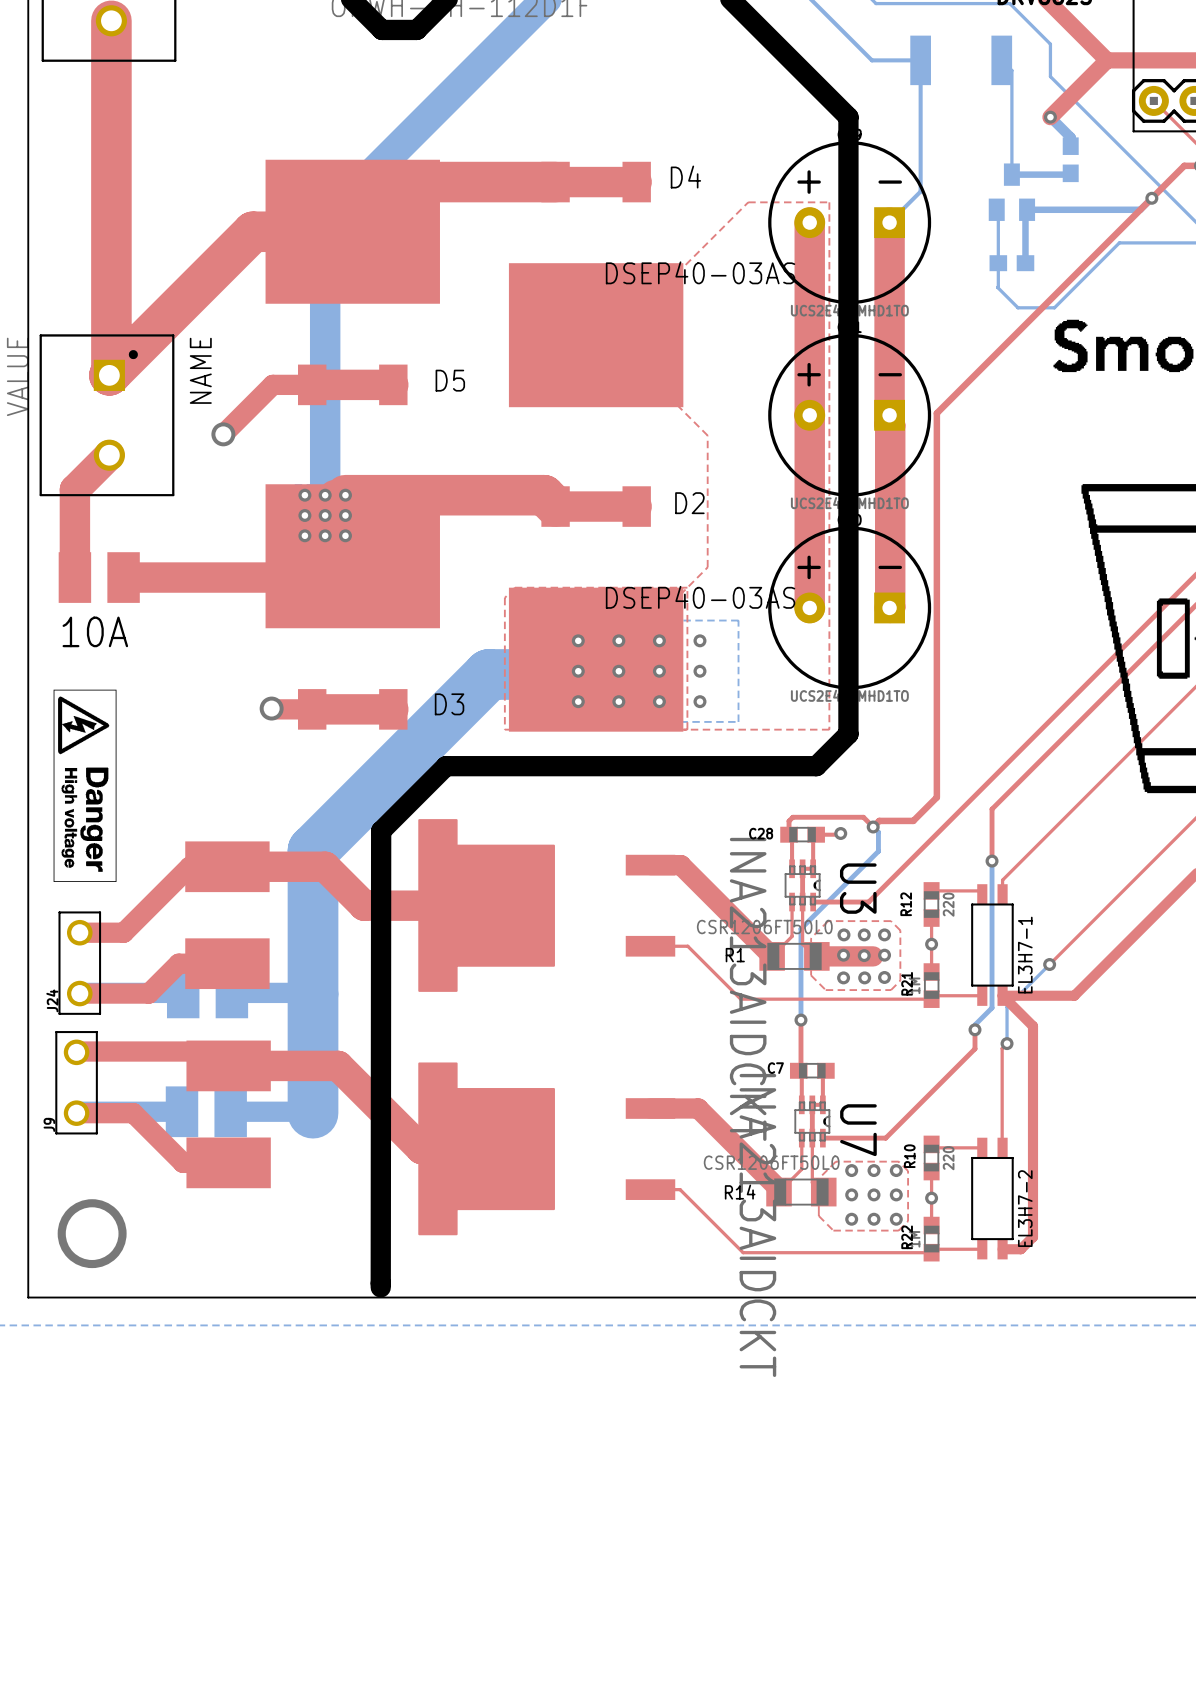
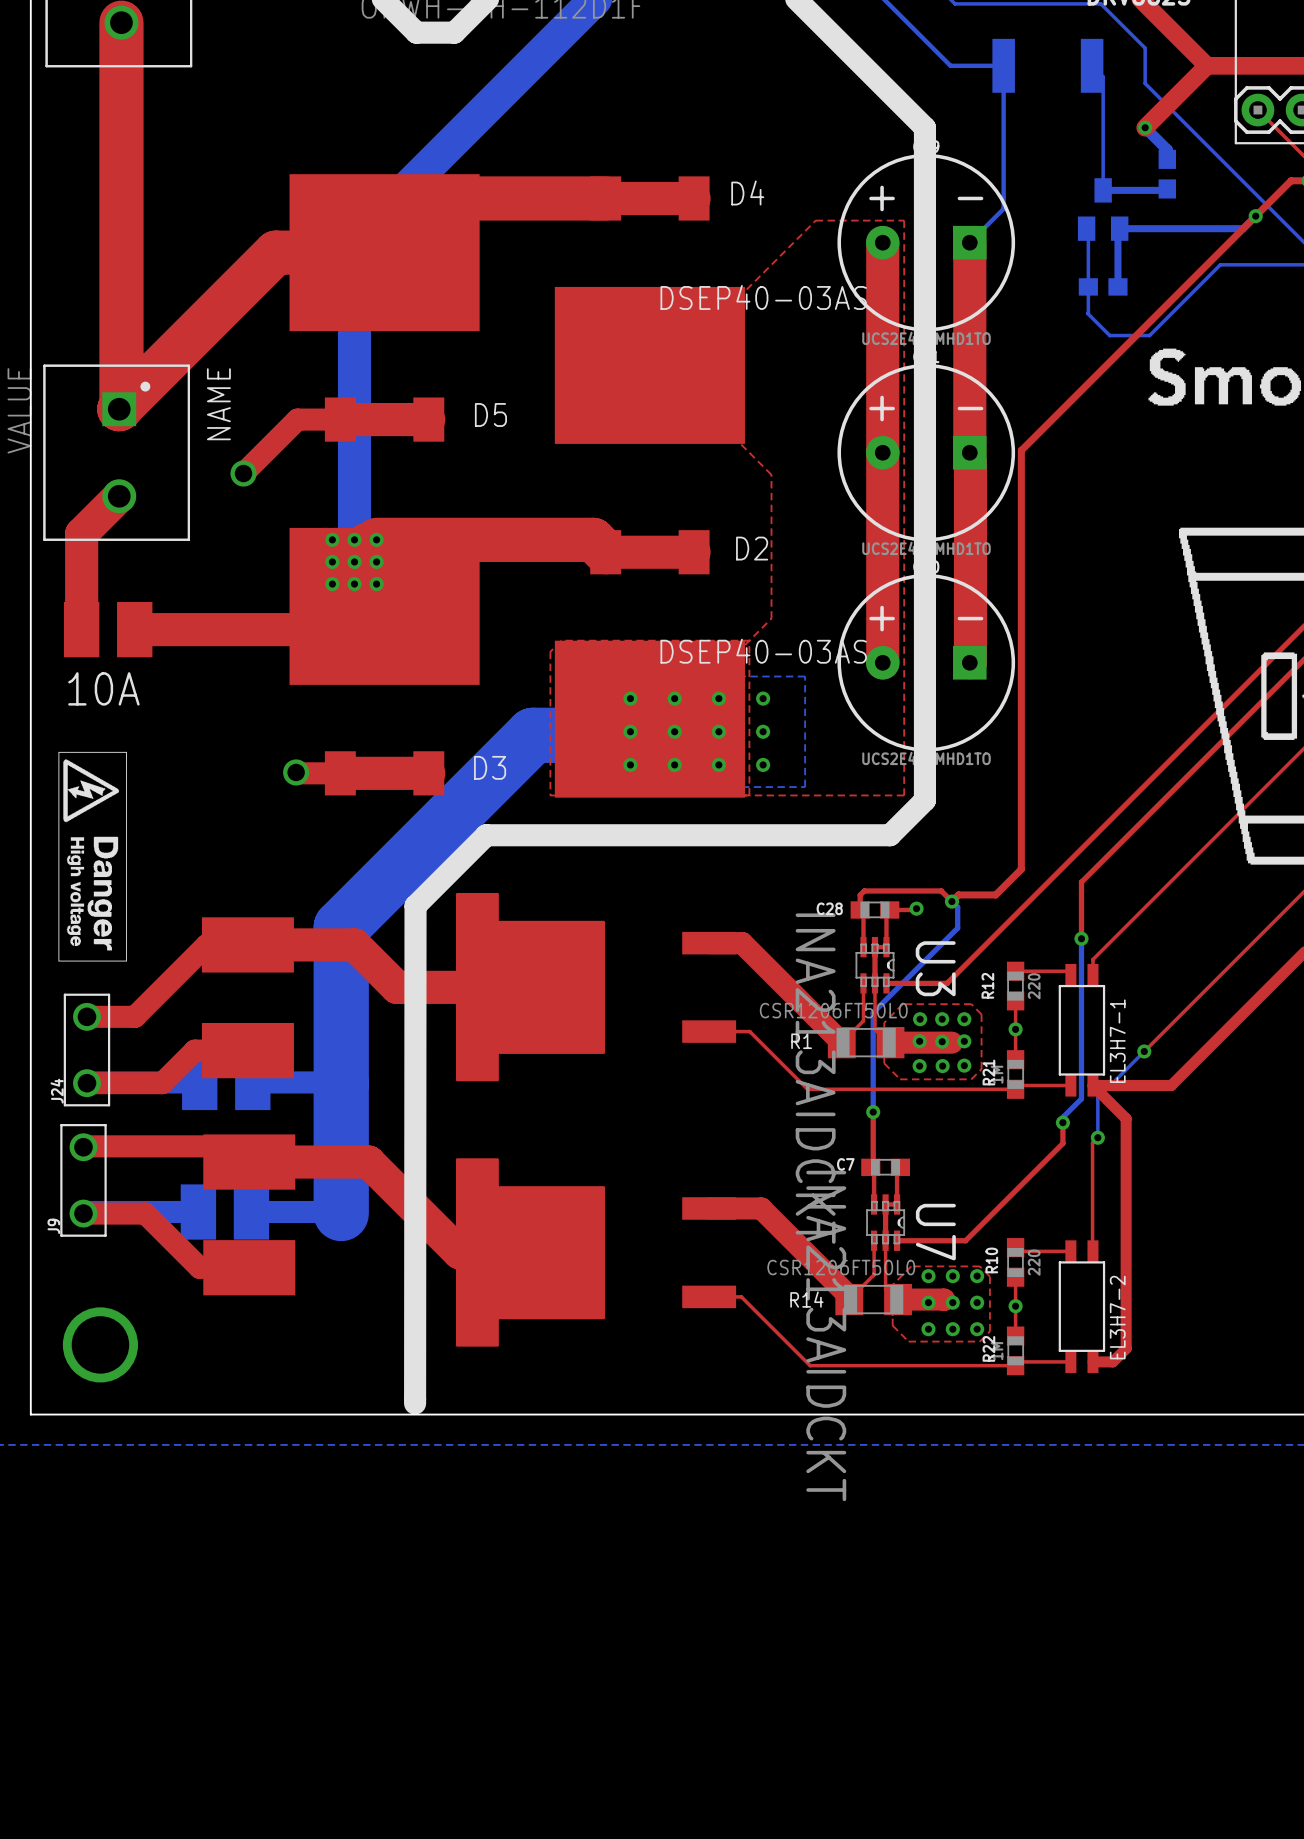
top track: none -> (898, 1299) (944, 1300)

